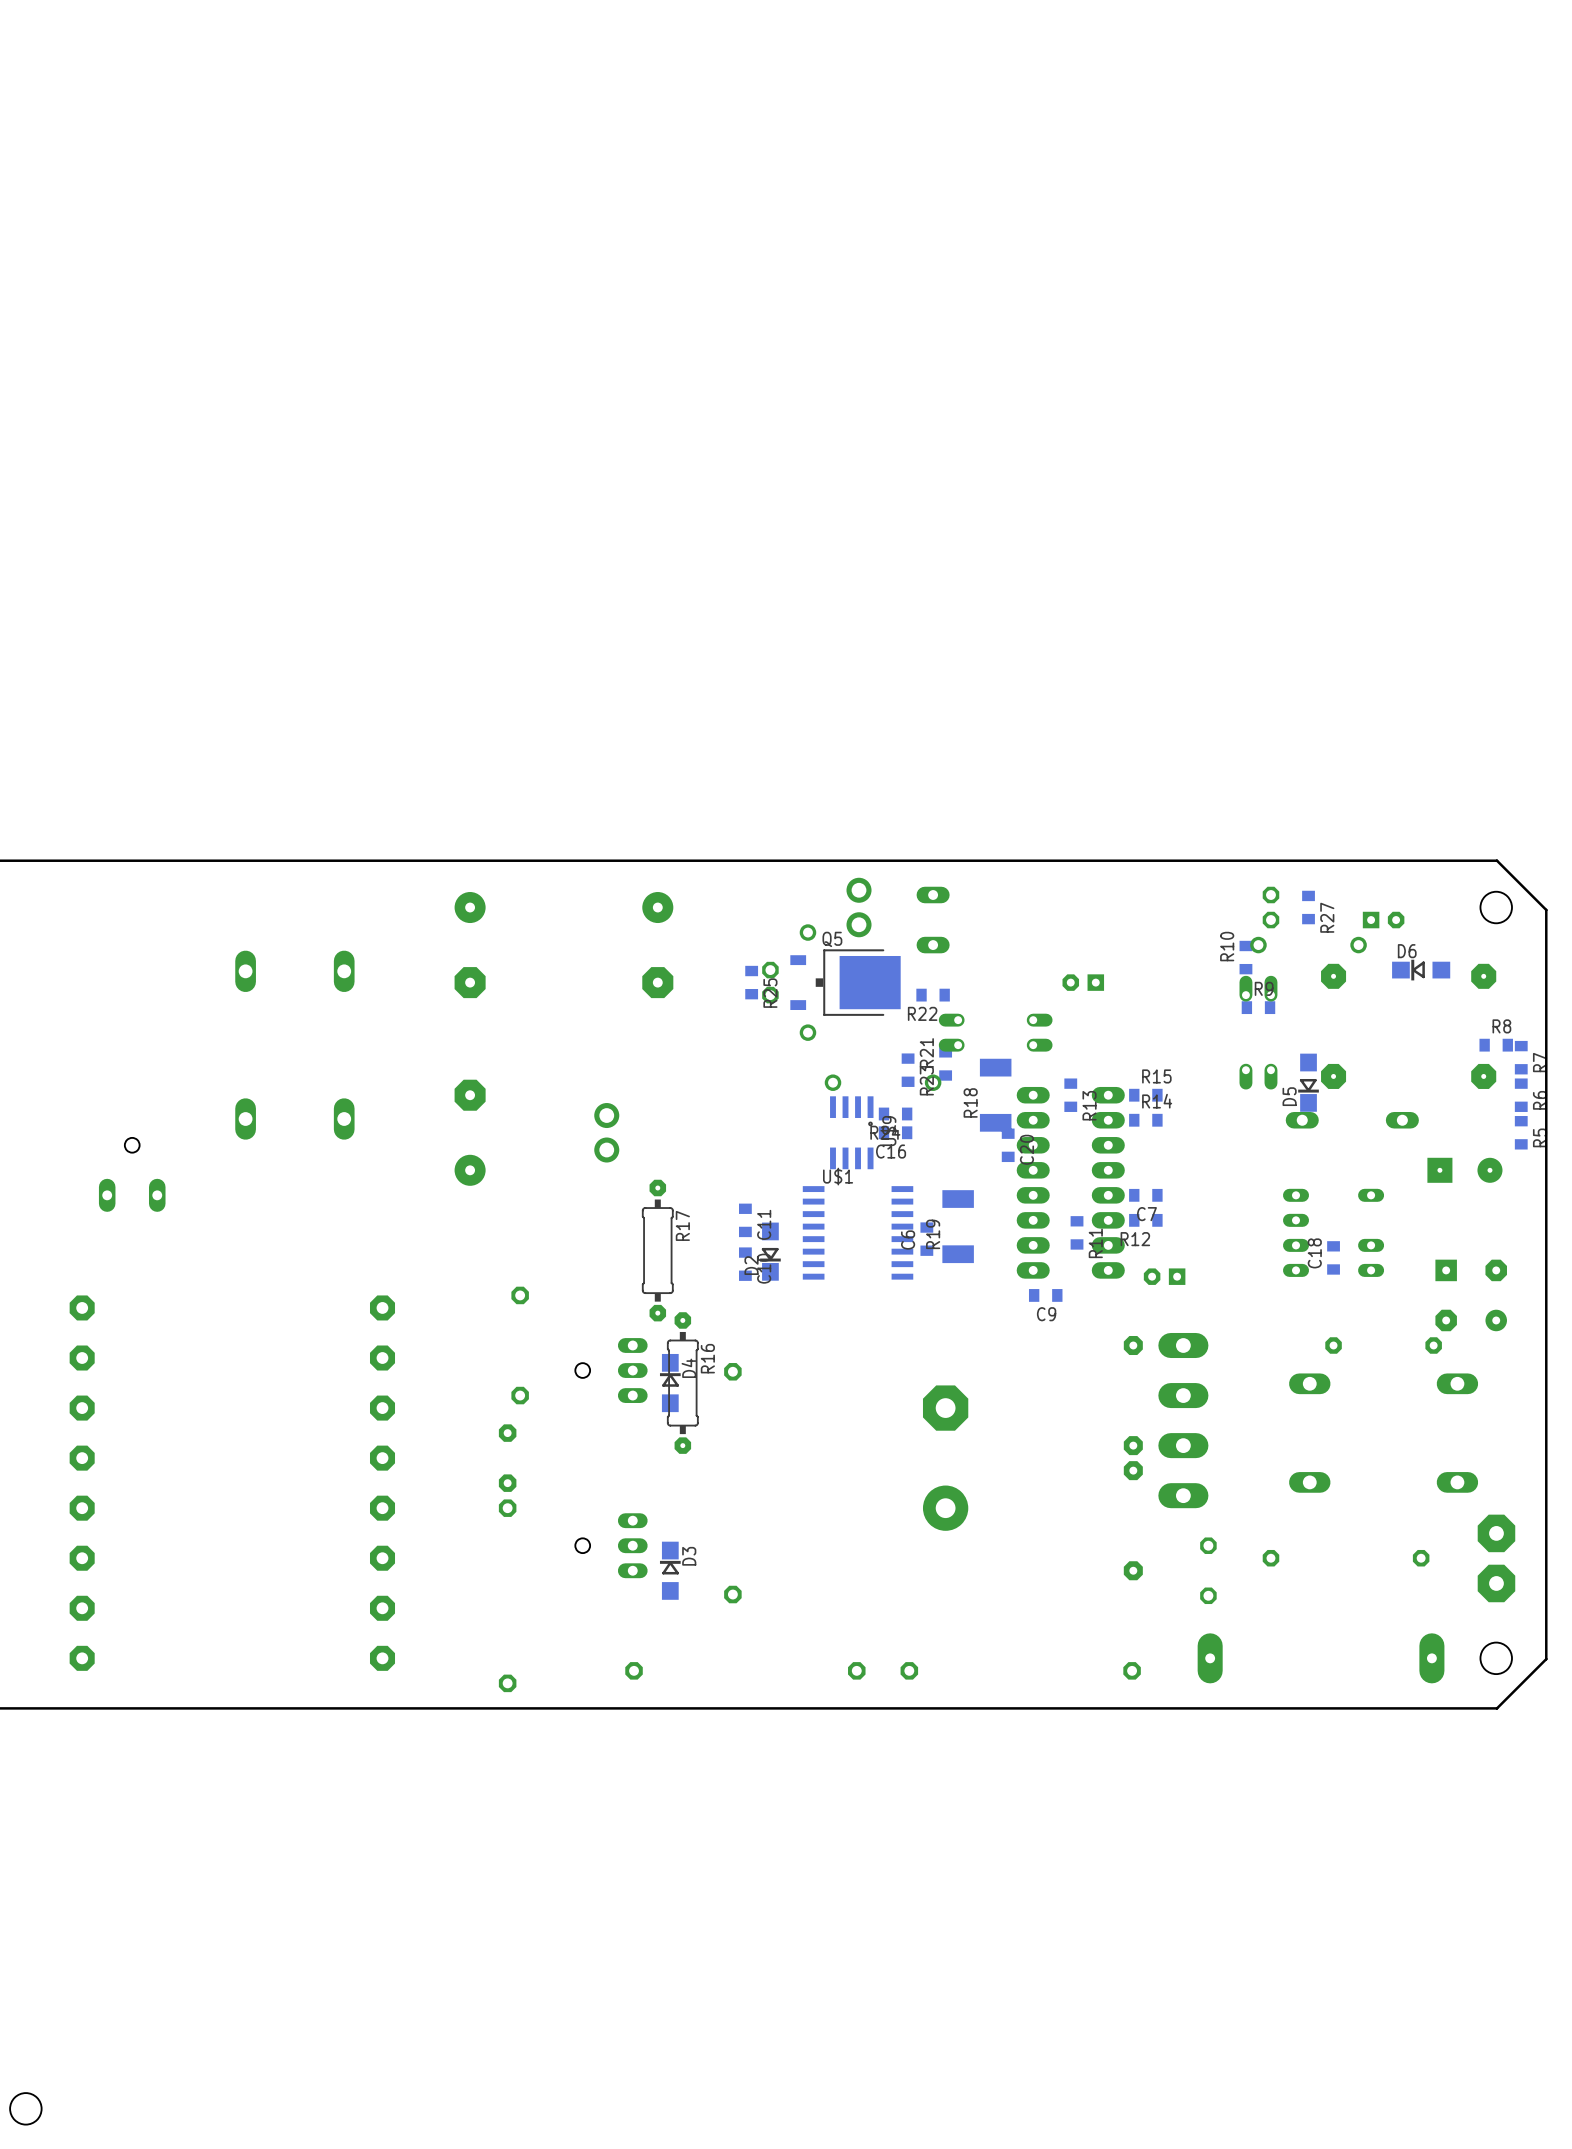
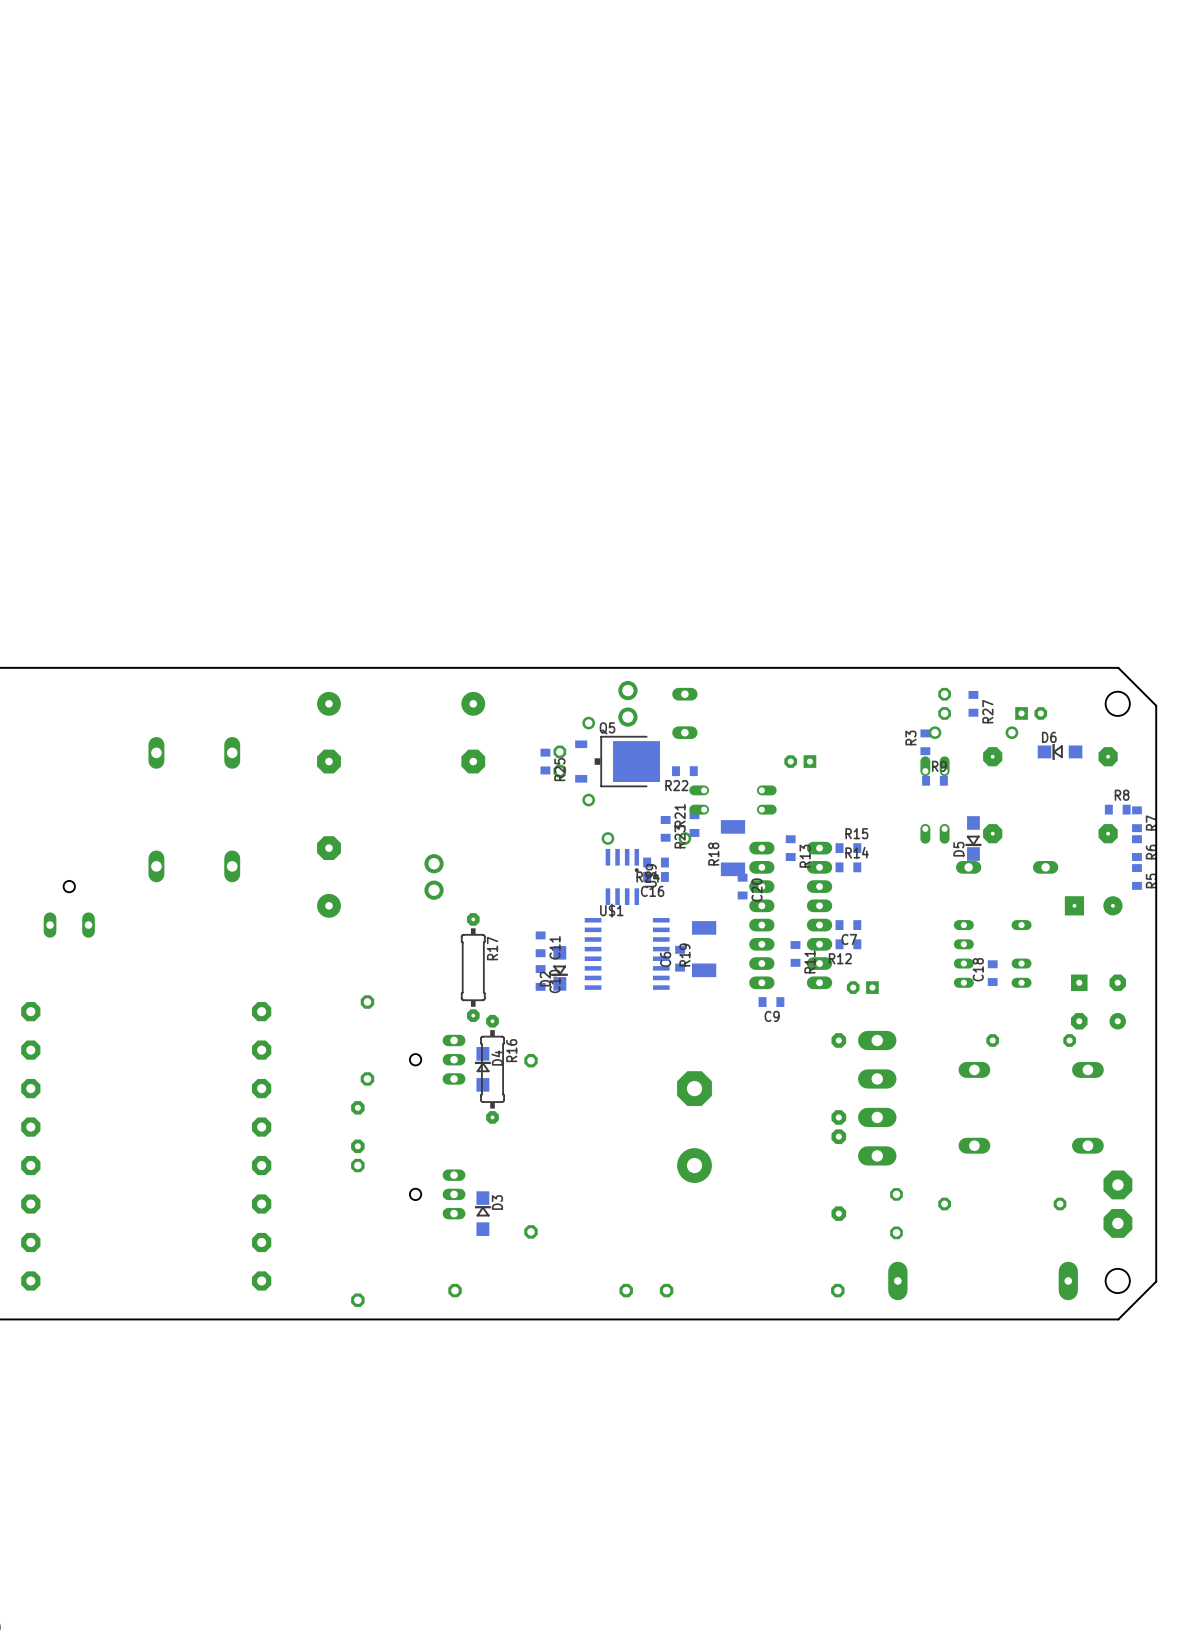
R10 name: R10 (1227, 946) -> R3 (910, 737)

